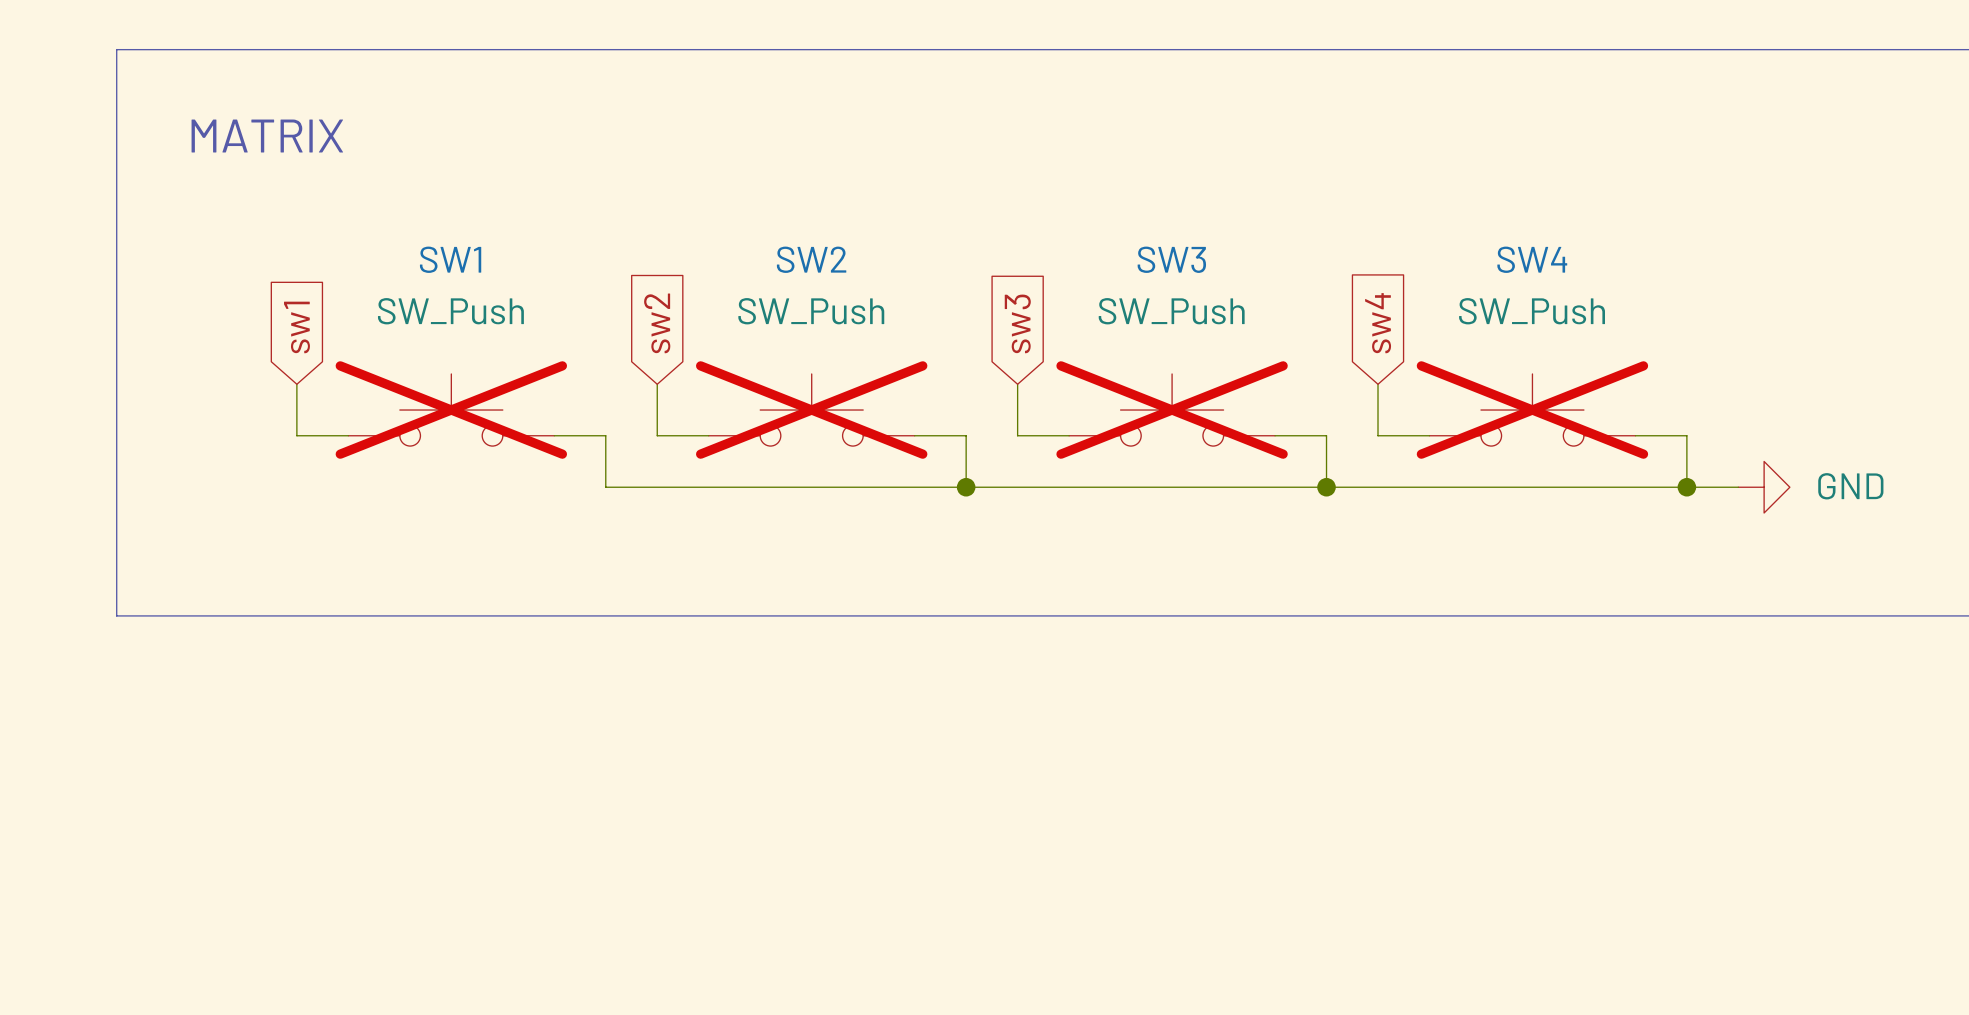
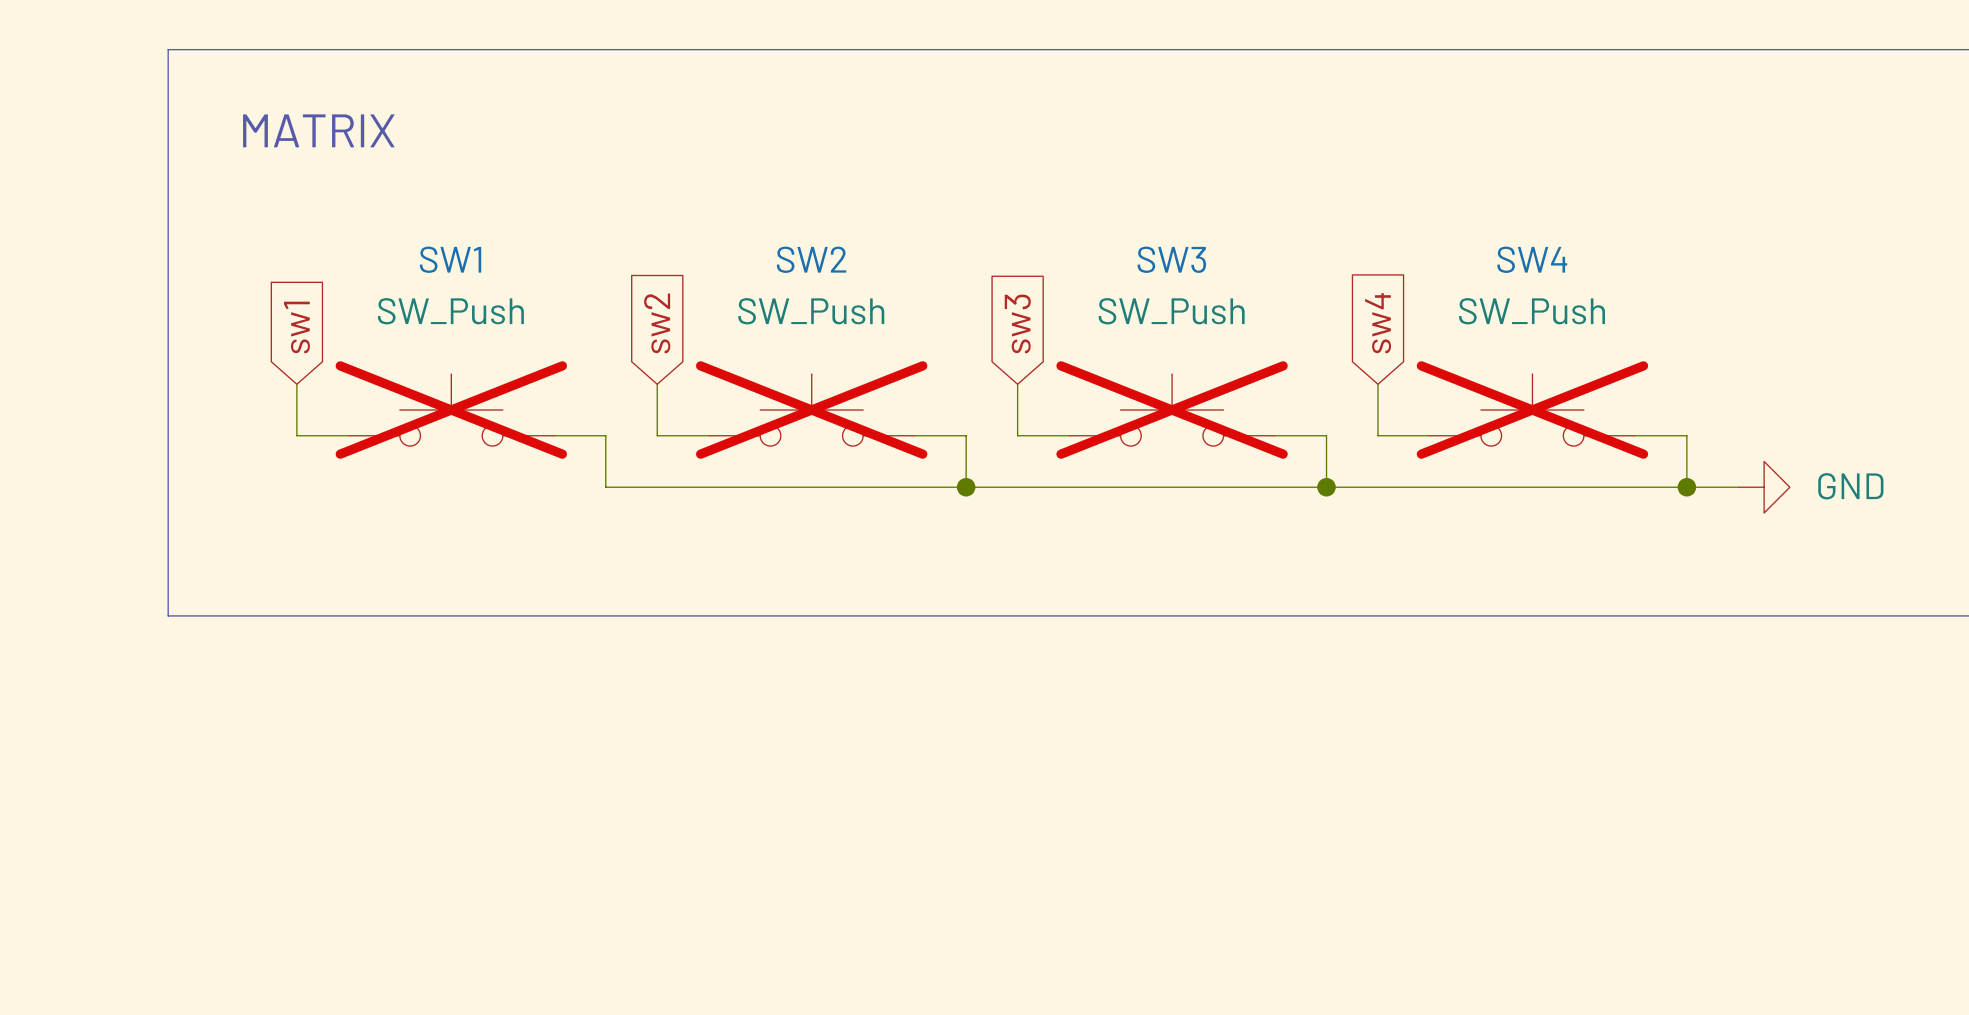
line: (168, 49) (116, 49) (116, 615) (168, 615) -> (168, 49) (168, 615)
text position: MATRIX (267, 136) -> MATRIX (318, 130)

